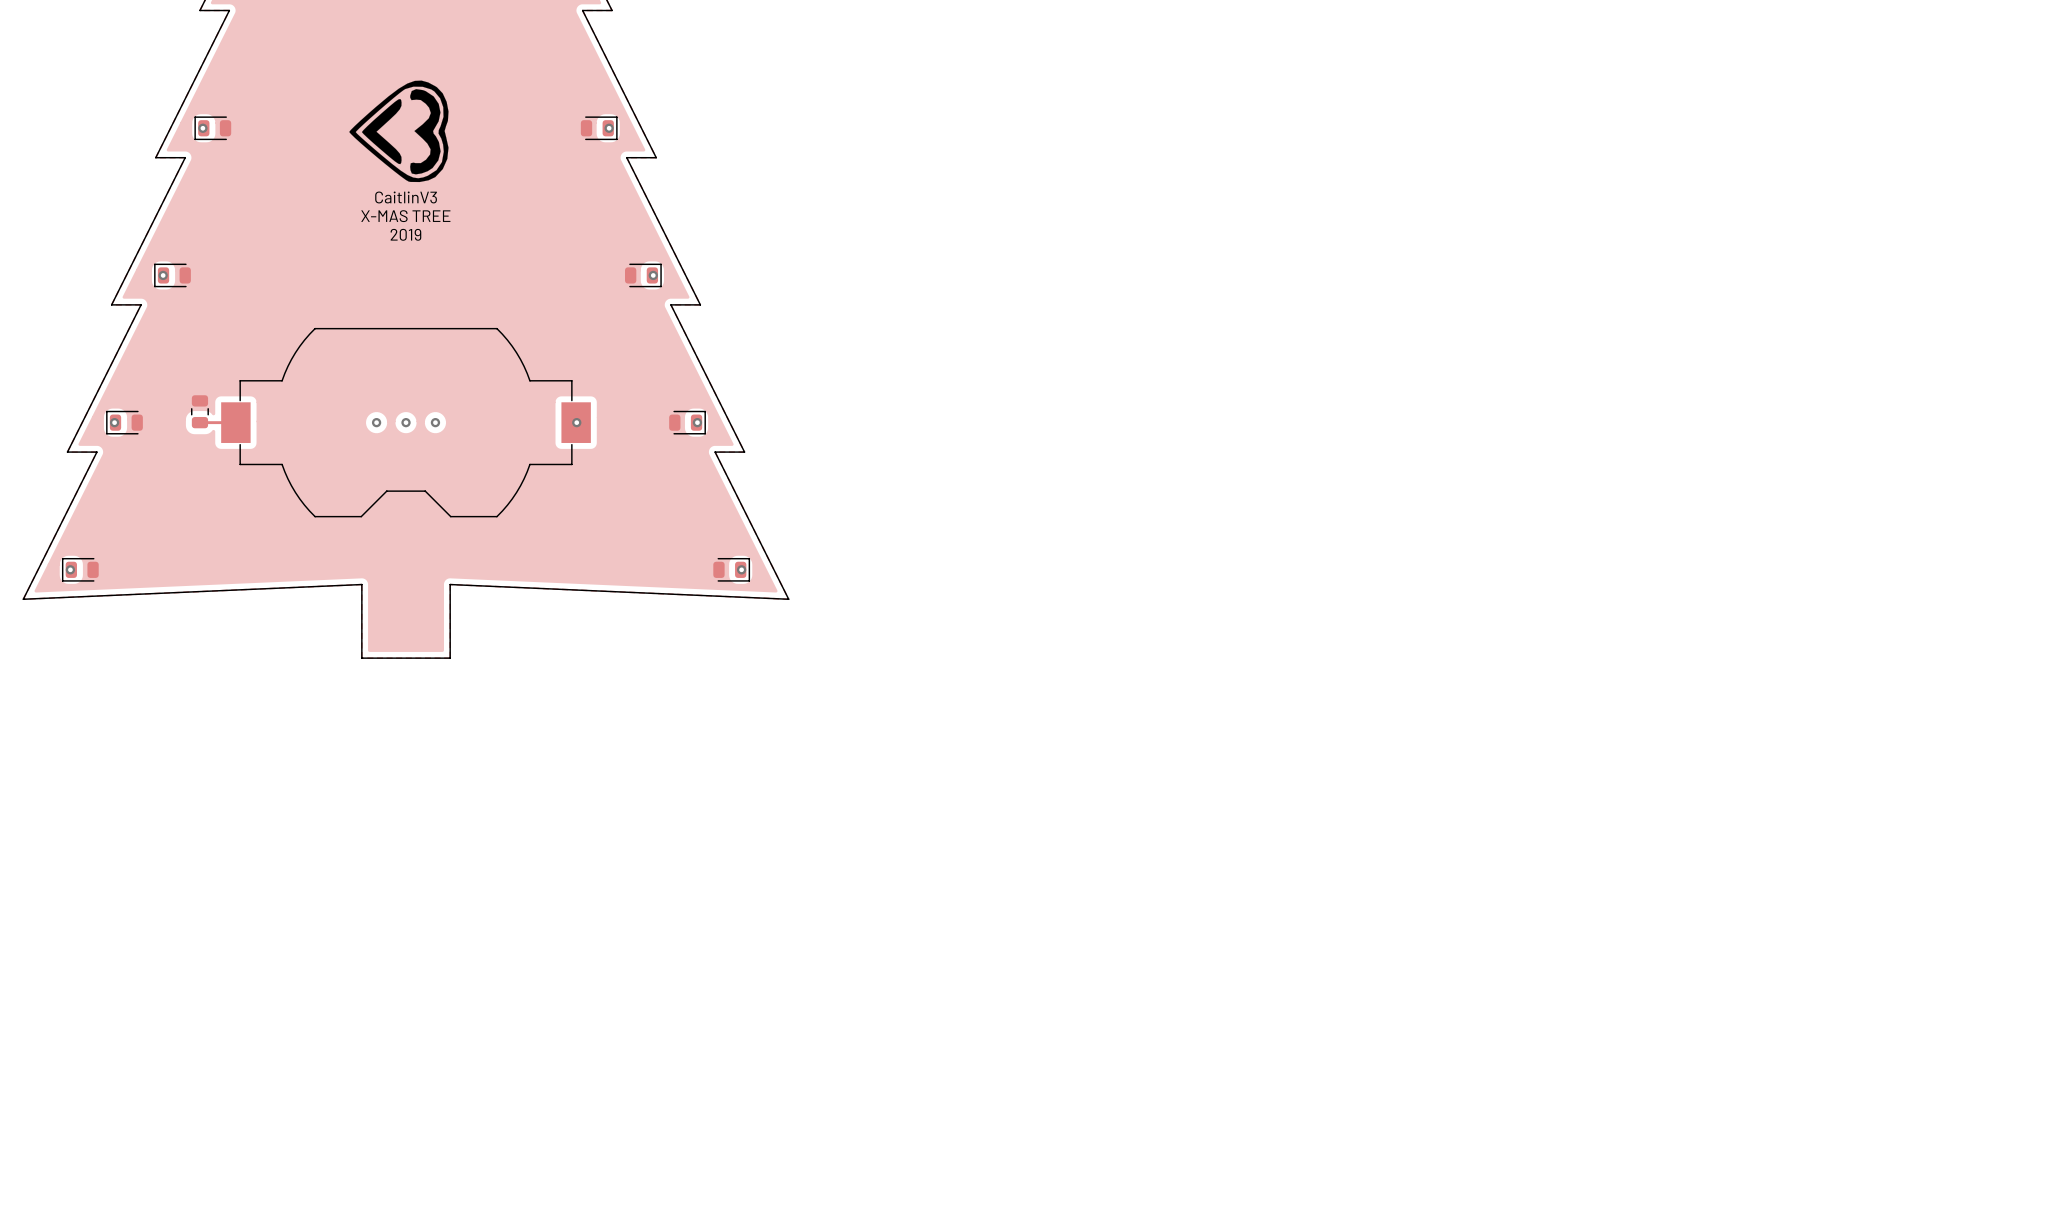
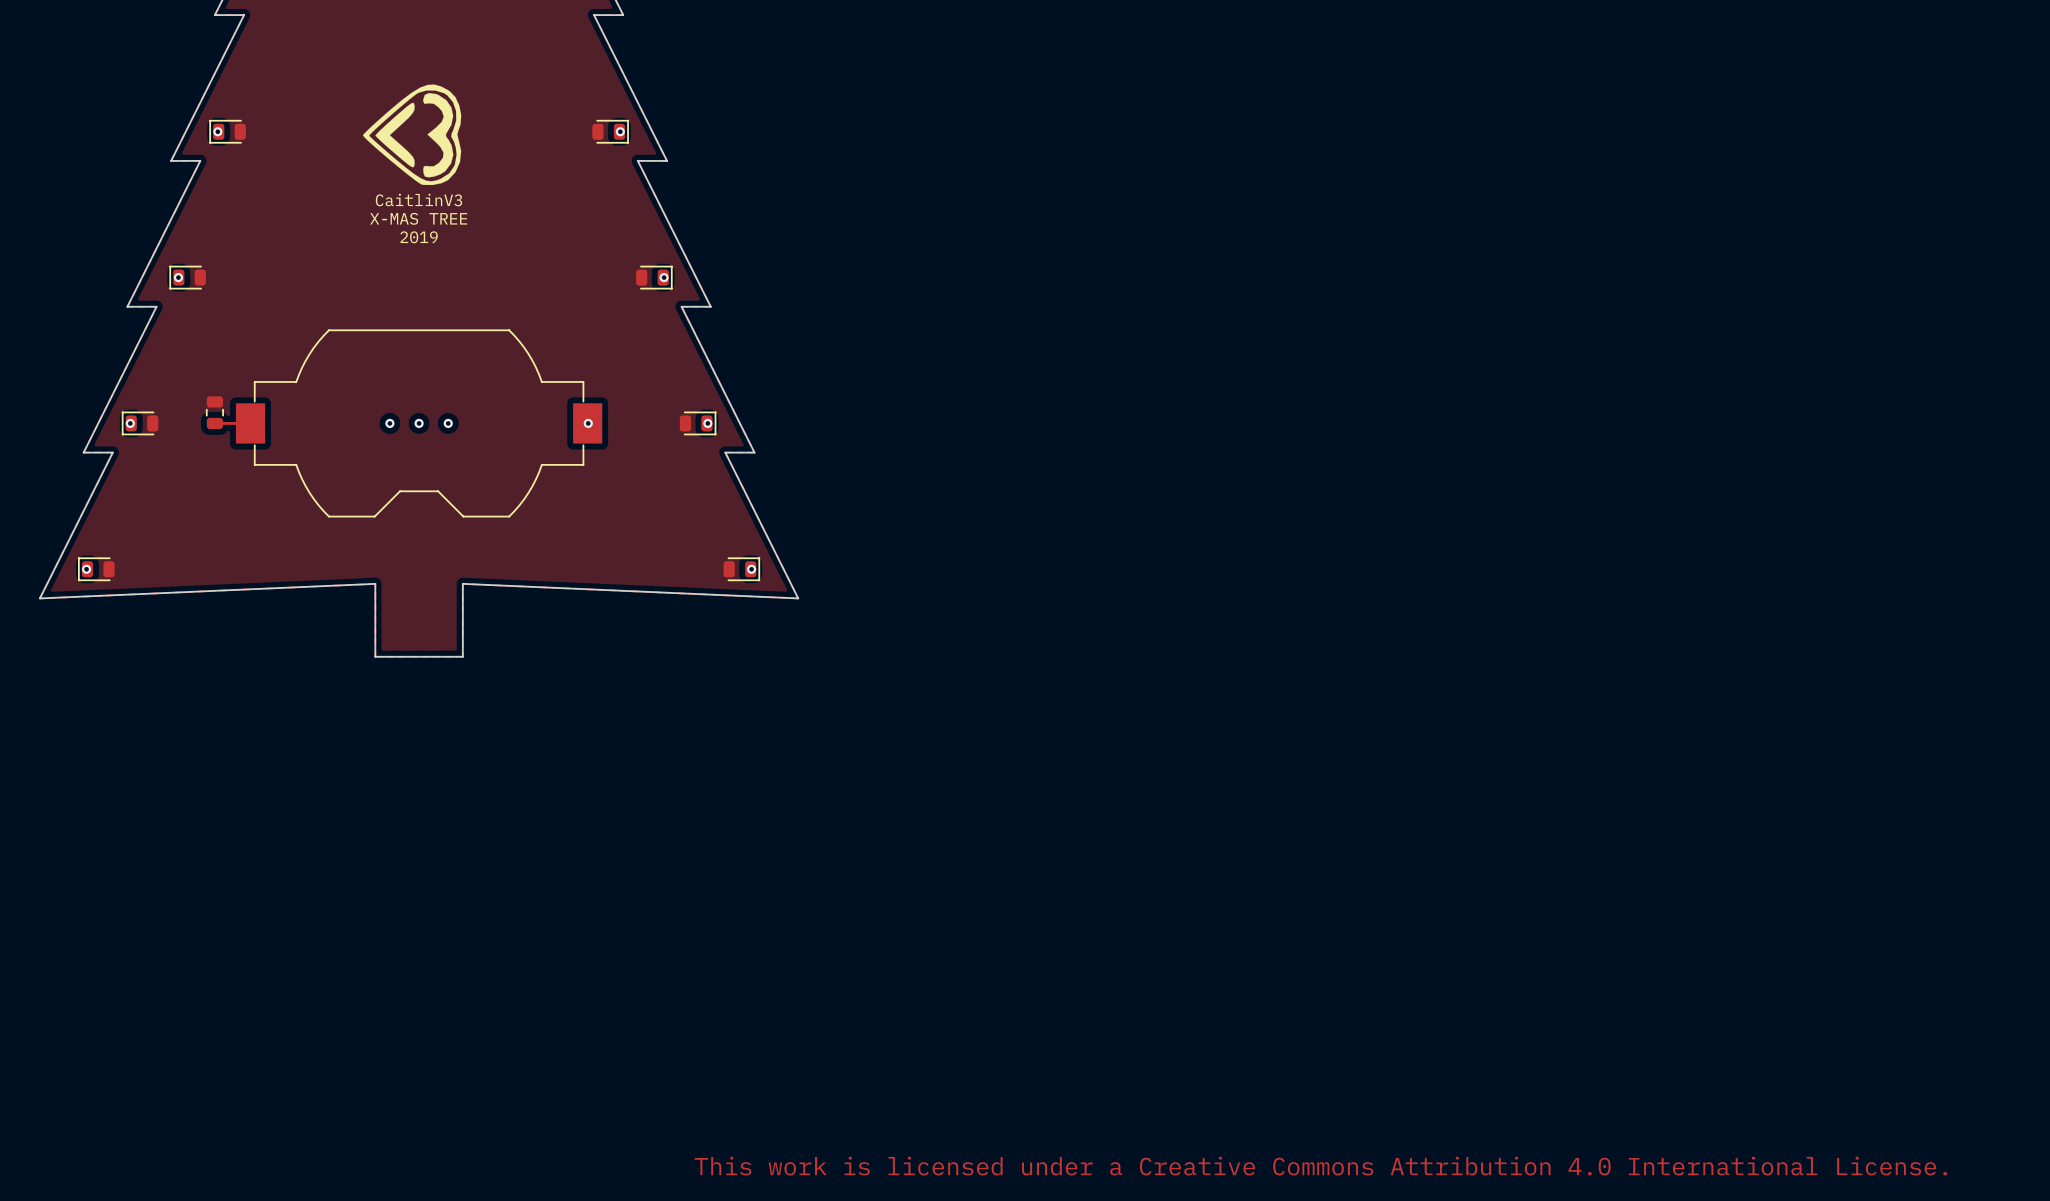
text: none -> This work is licensed under a Creative Commons Attribution 4.0 International License. (1320, 1166)

